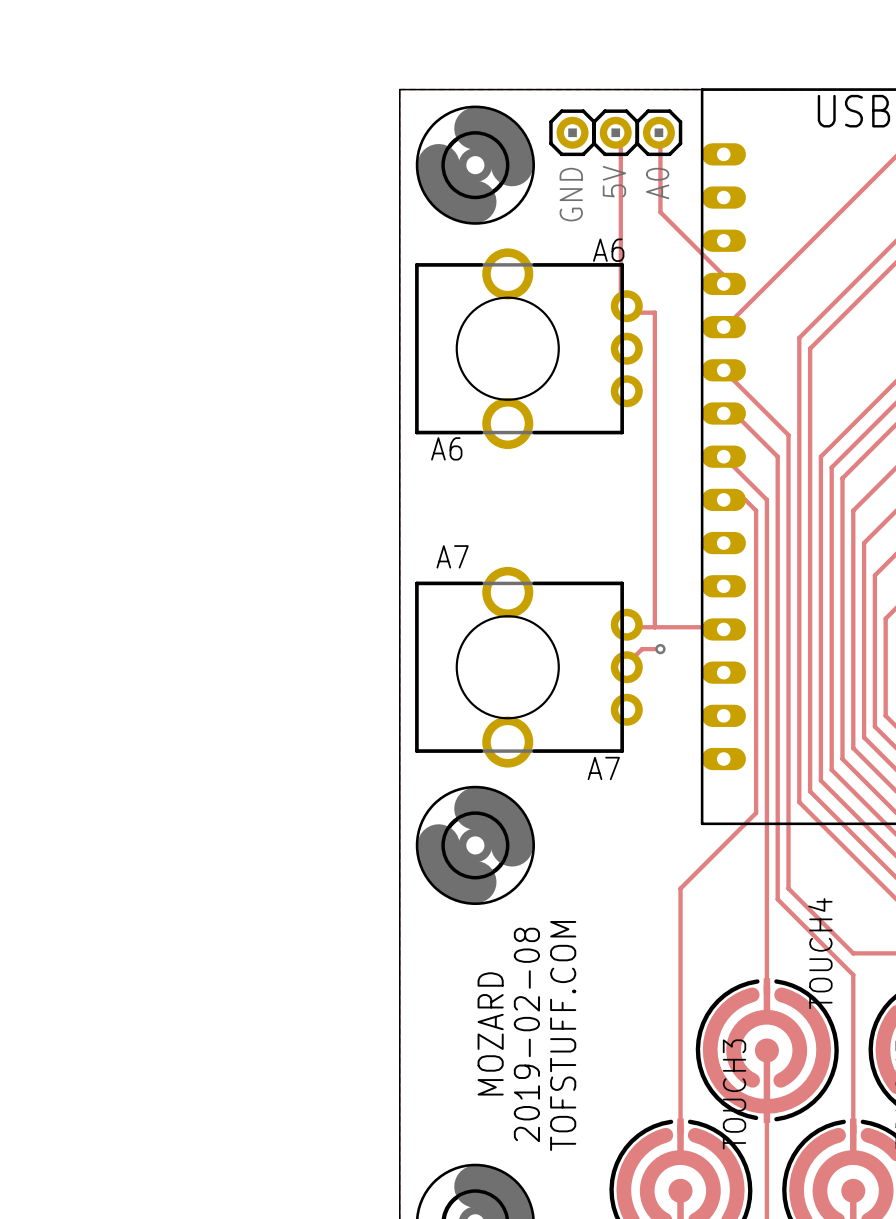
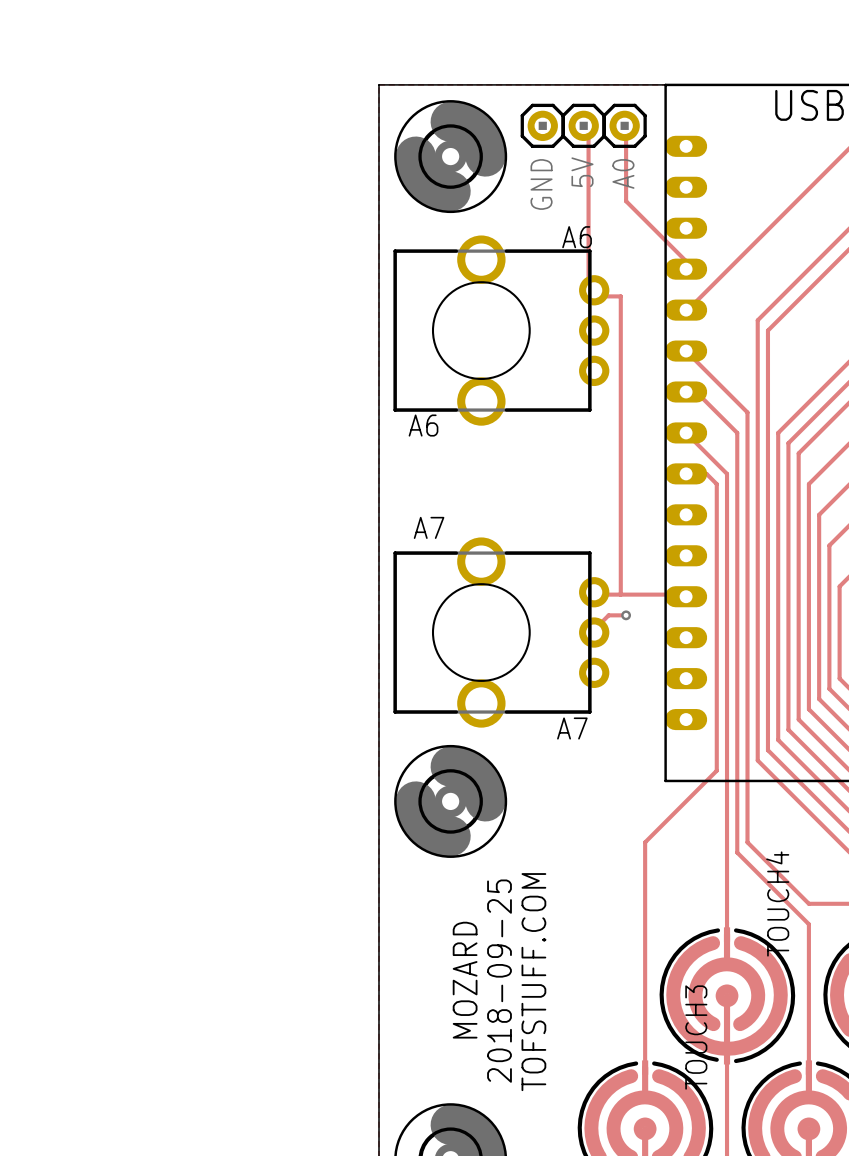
text: 2019-02-08 (526, 1034) -> 2018-09-25 (499, 981)

